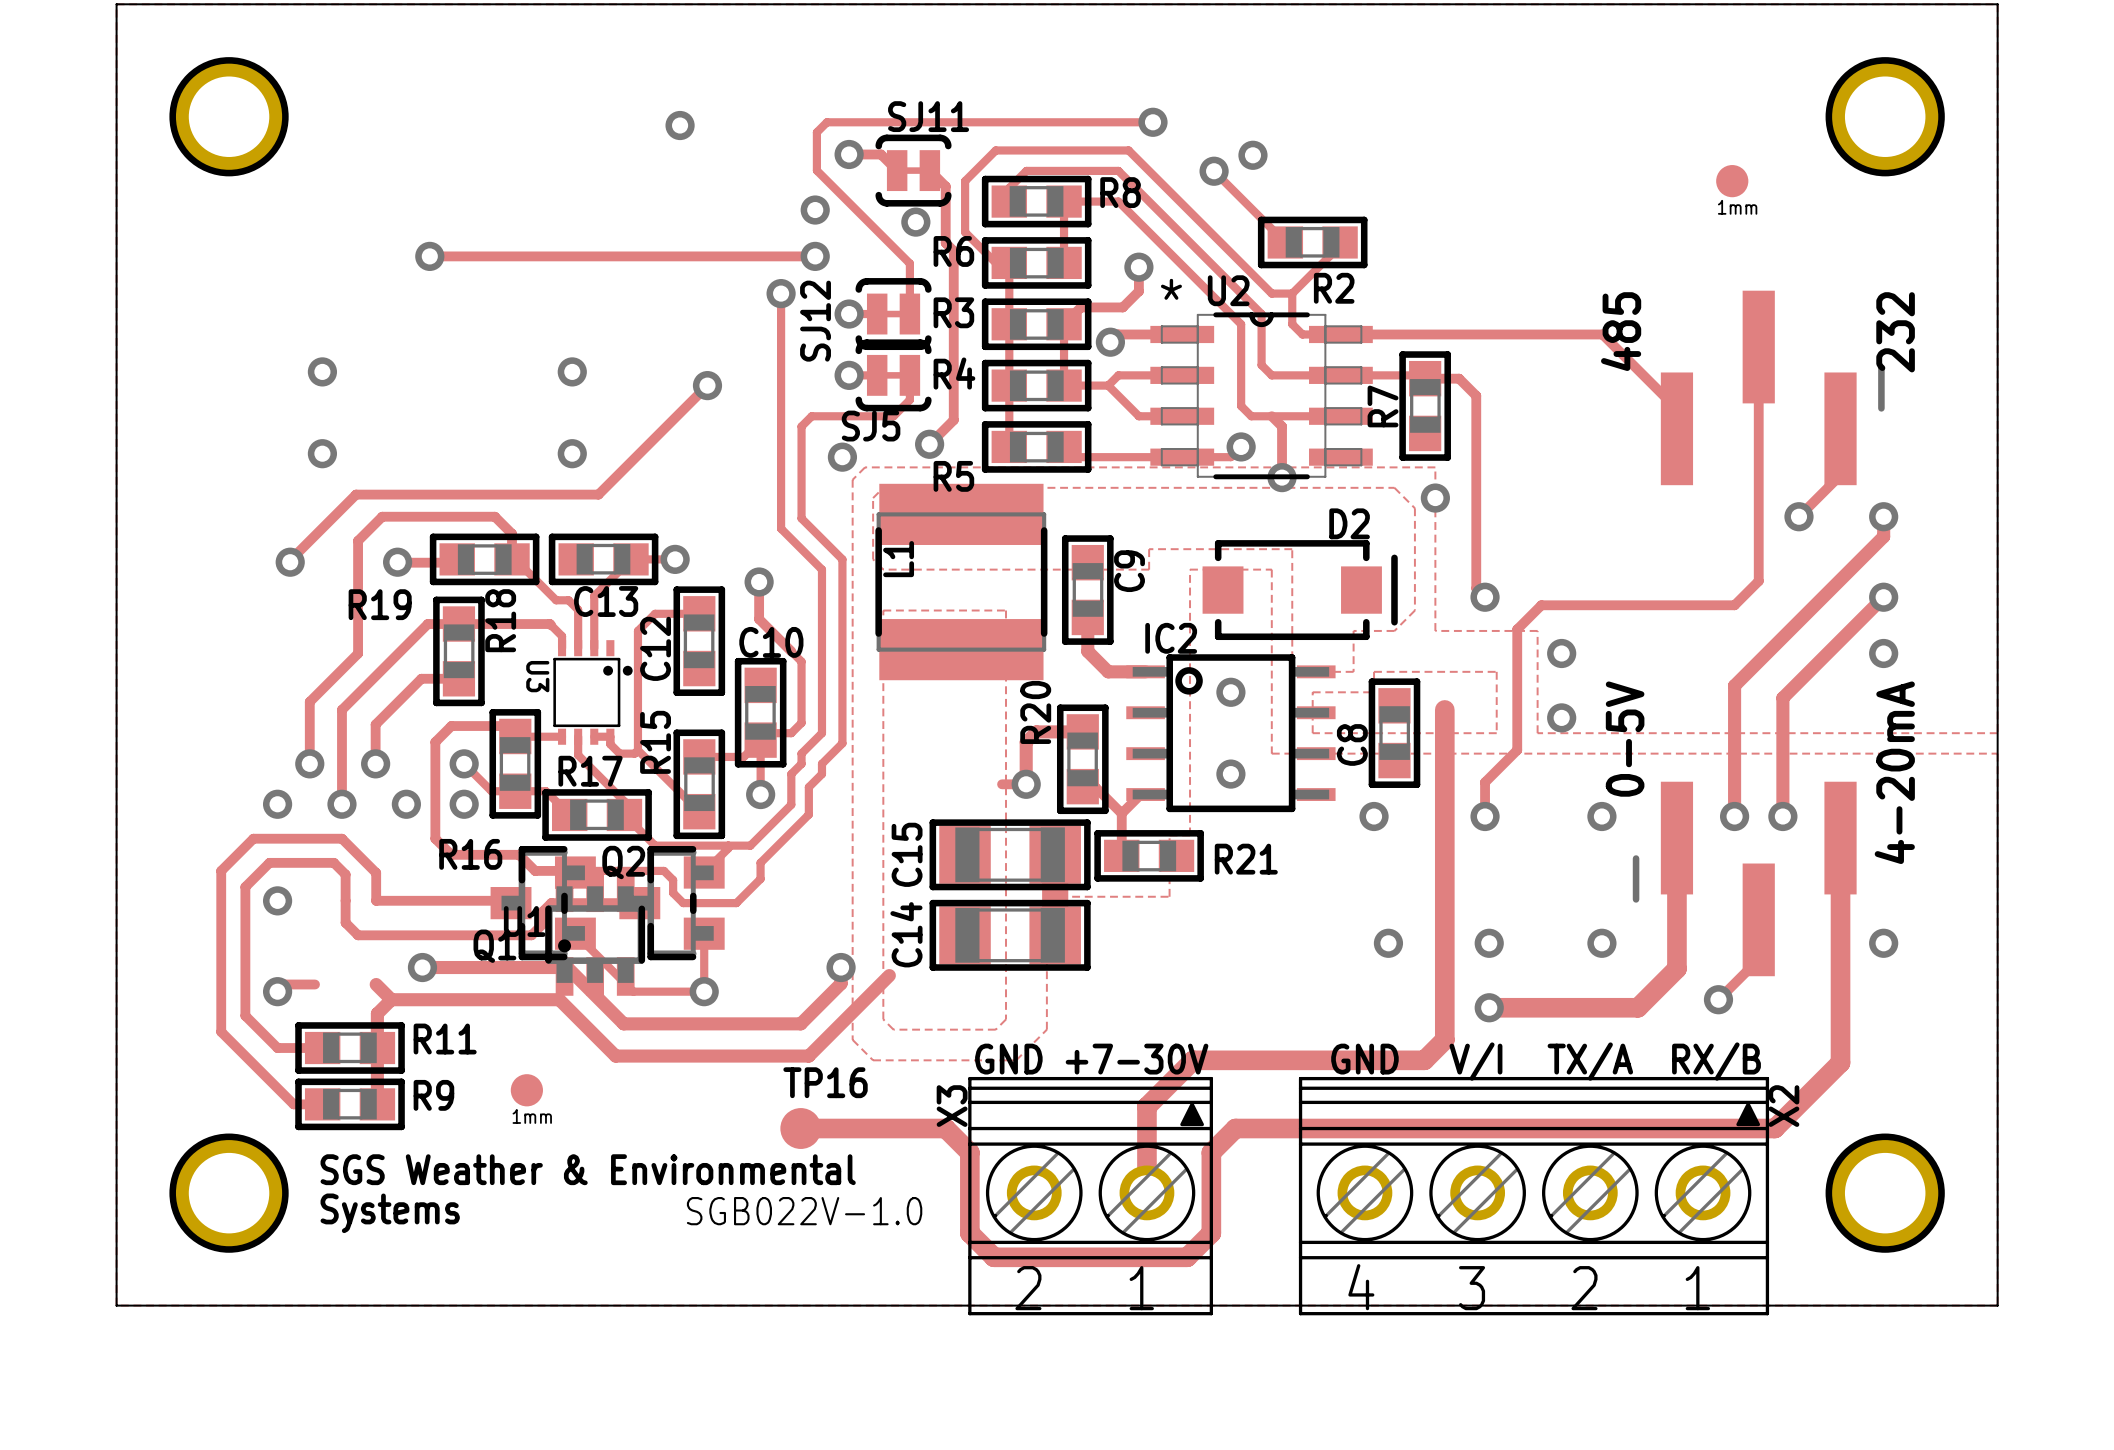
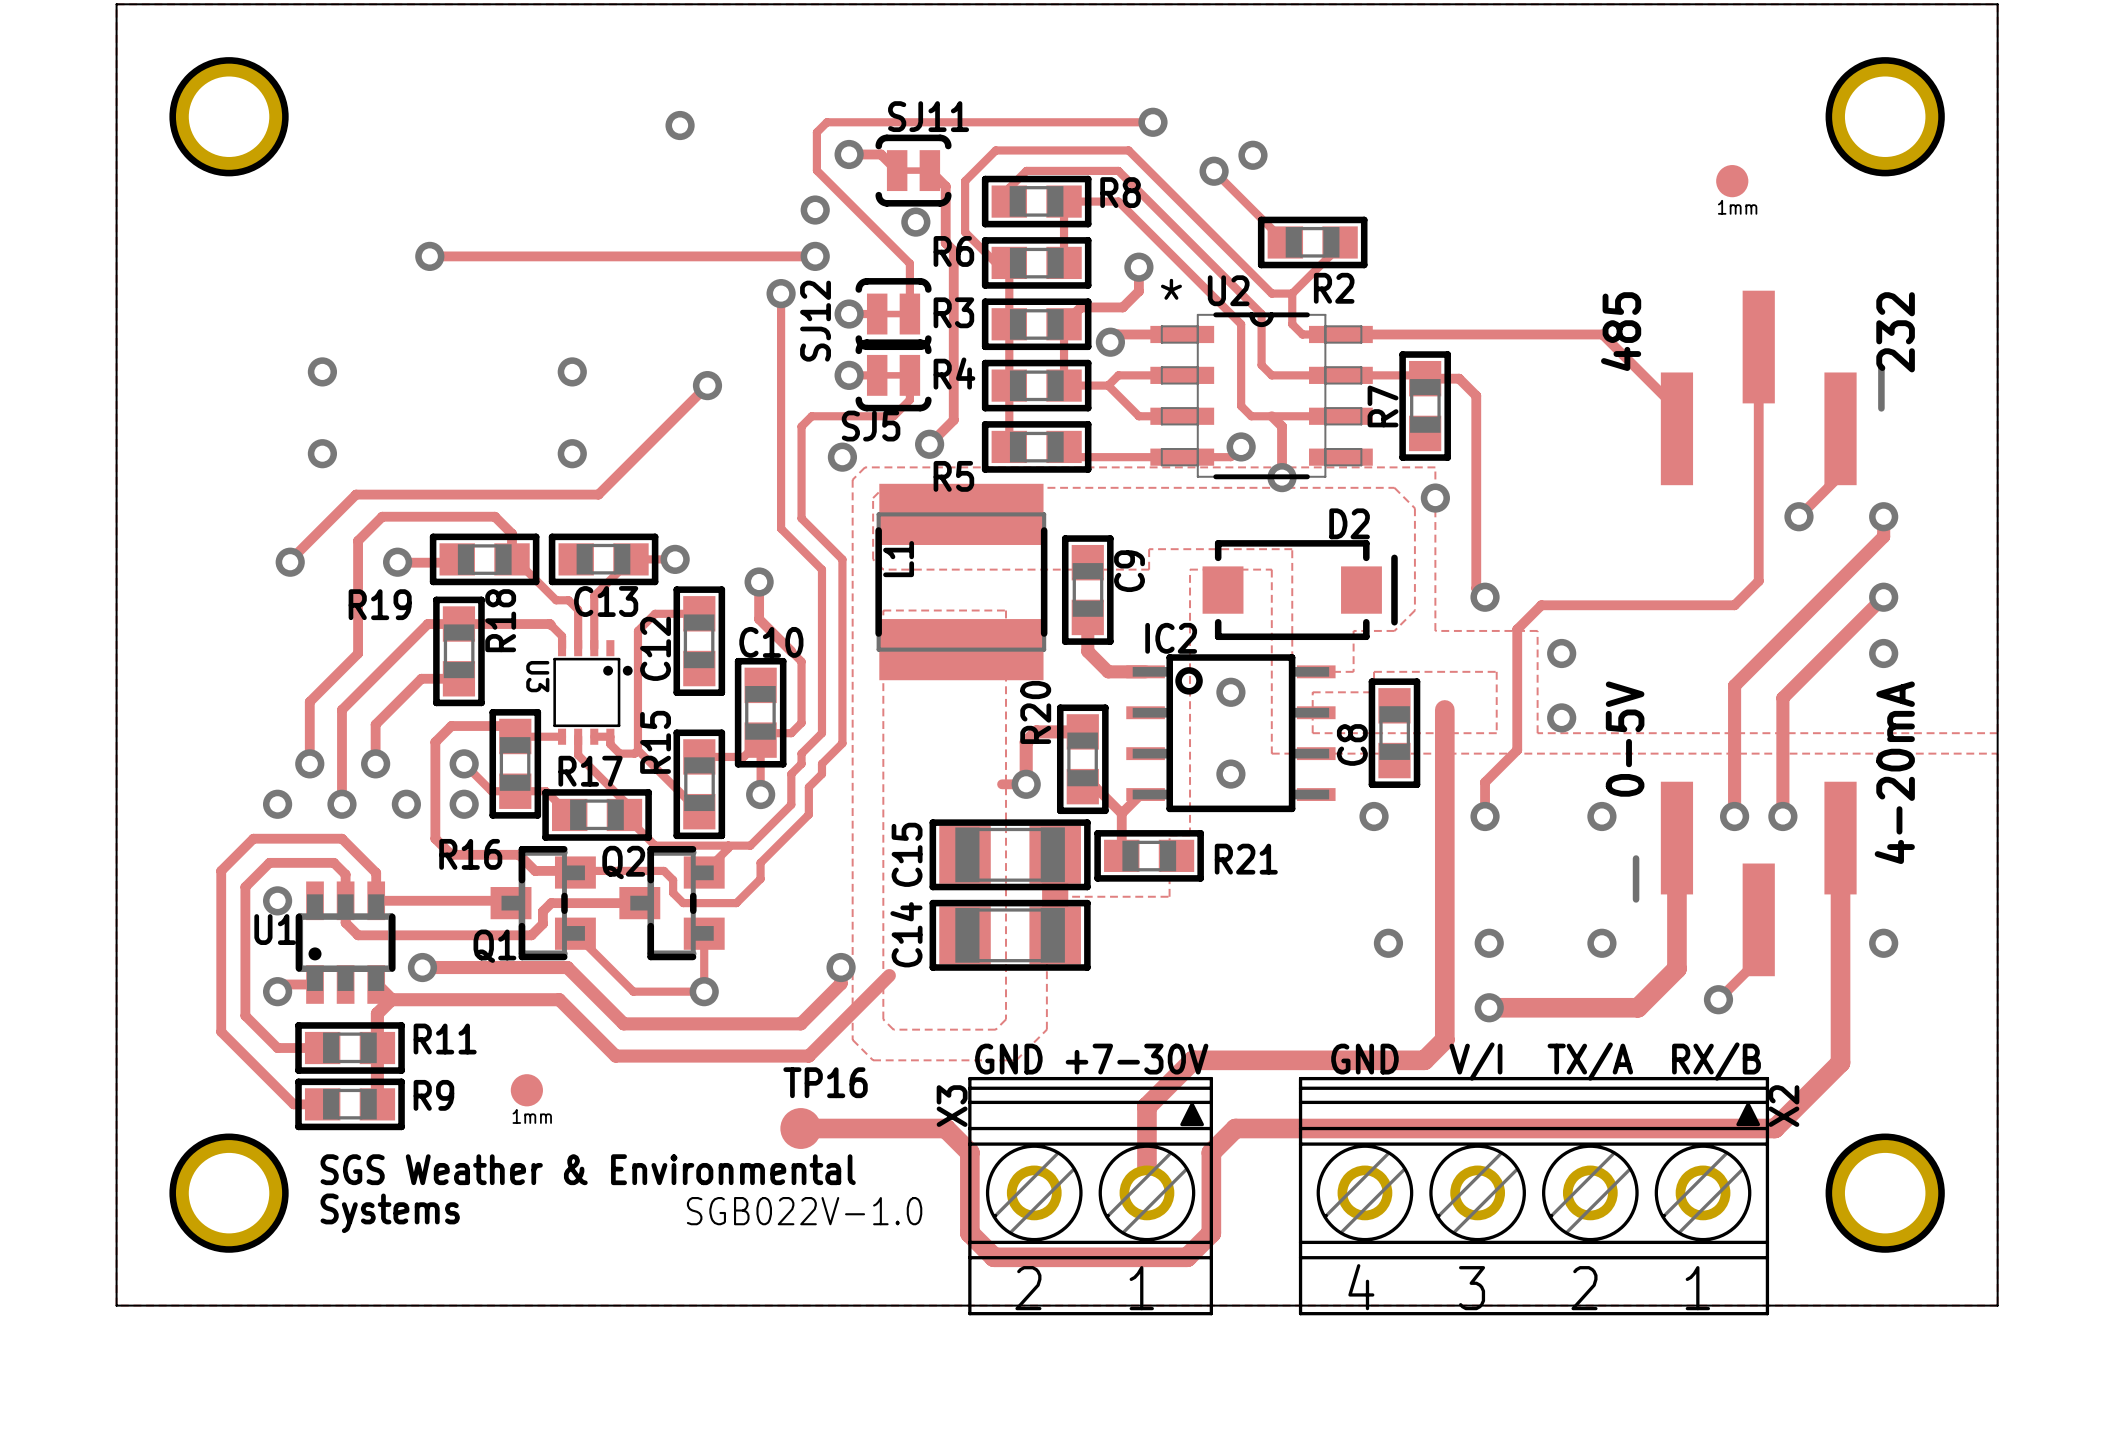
U1 position: (595, 934) -> (345, 942)

